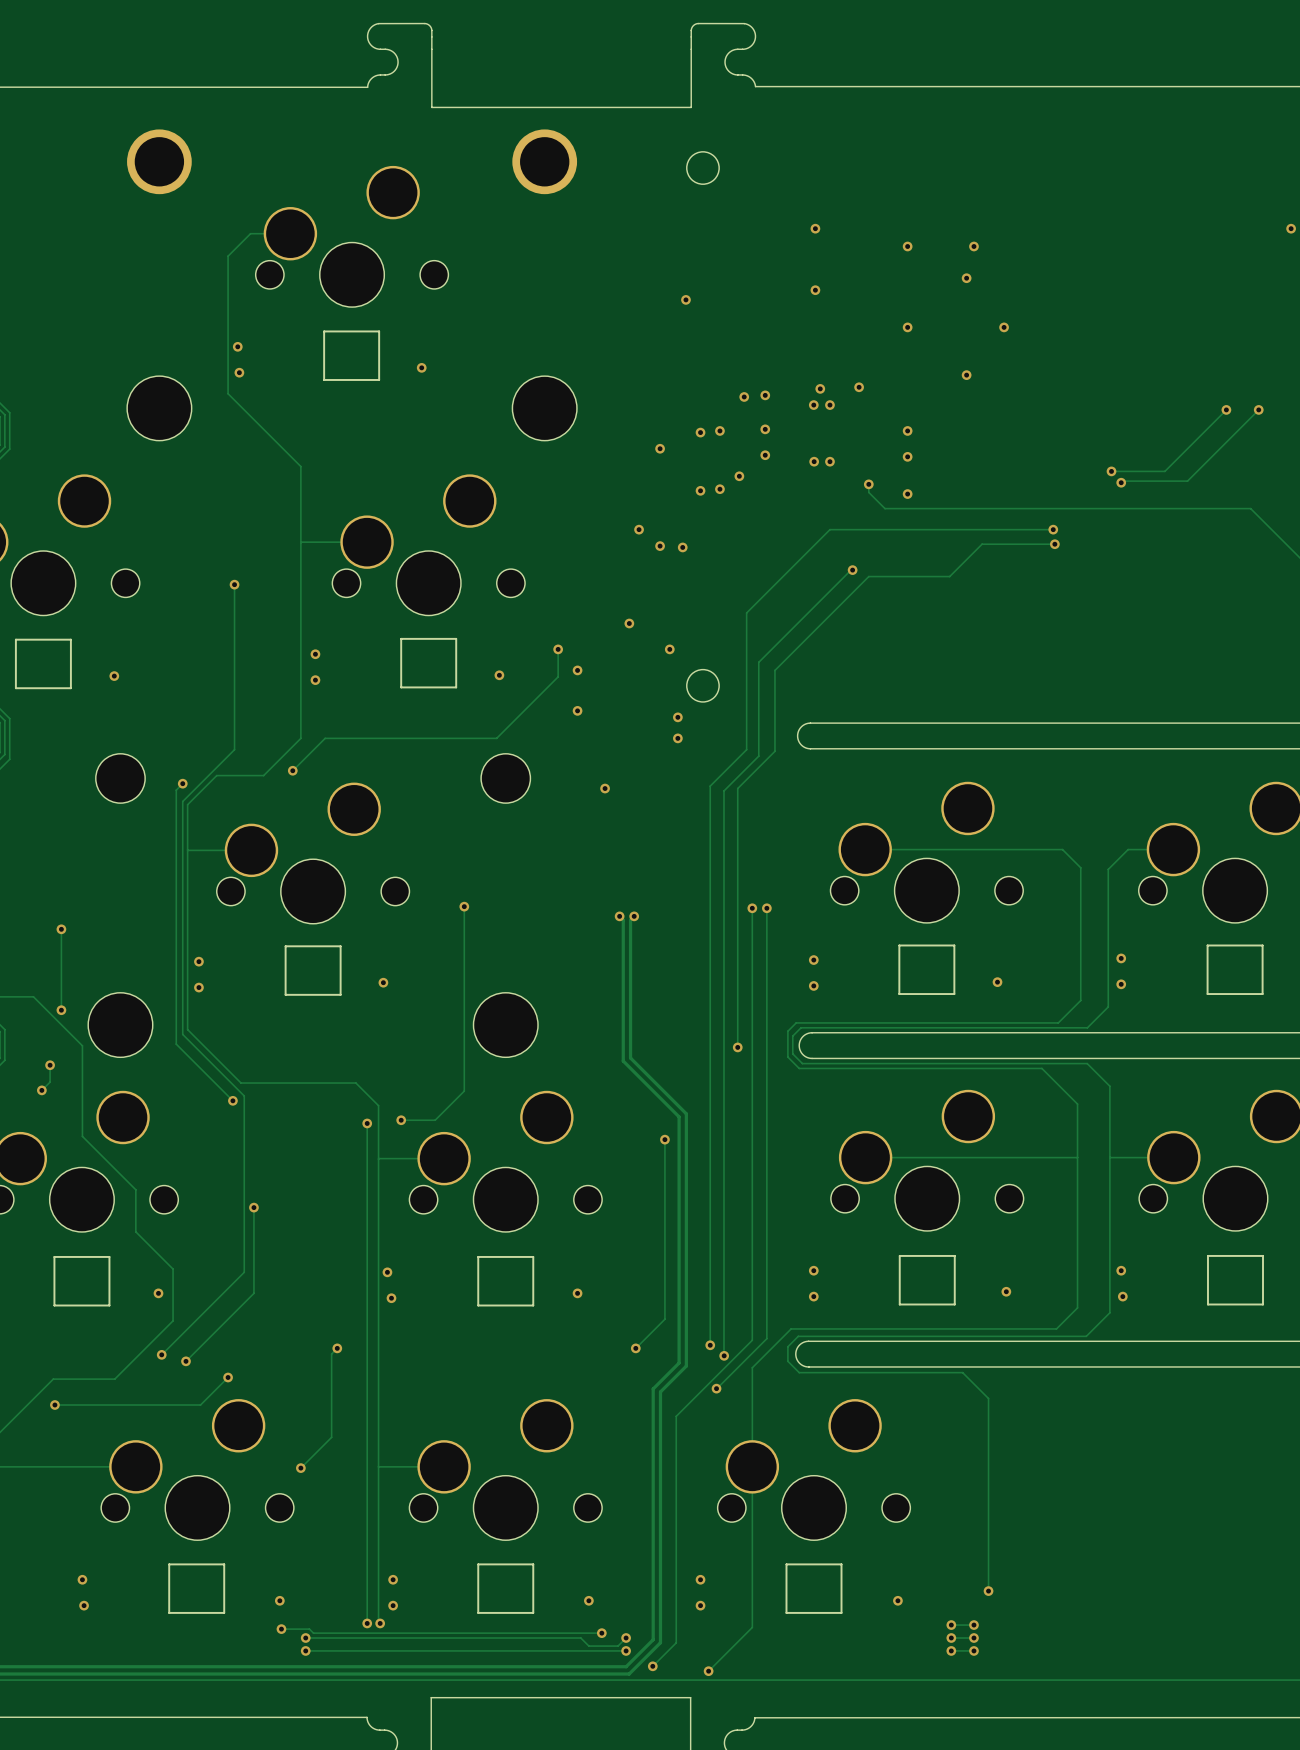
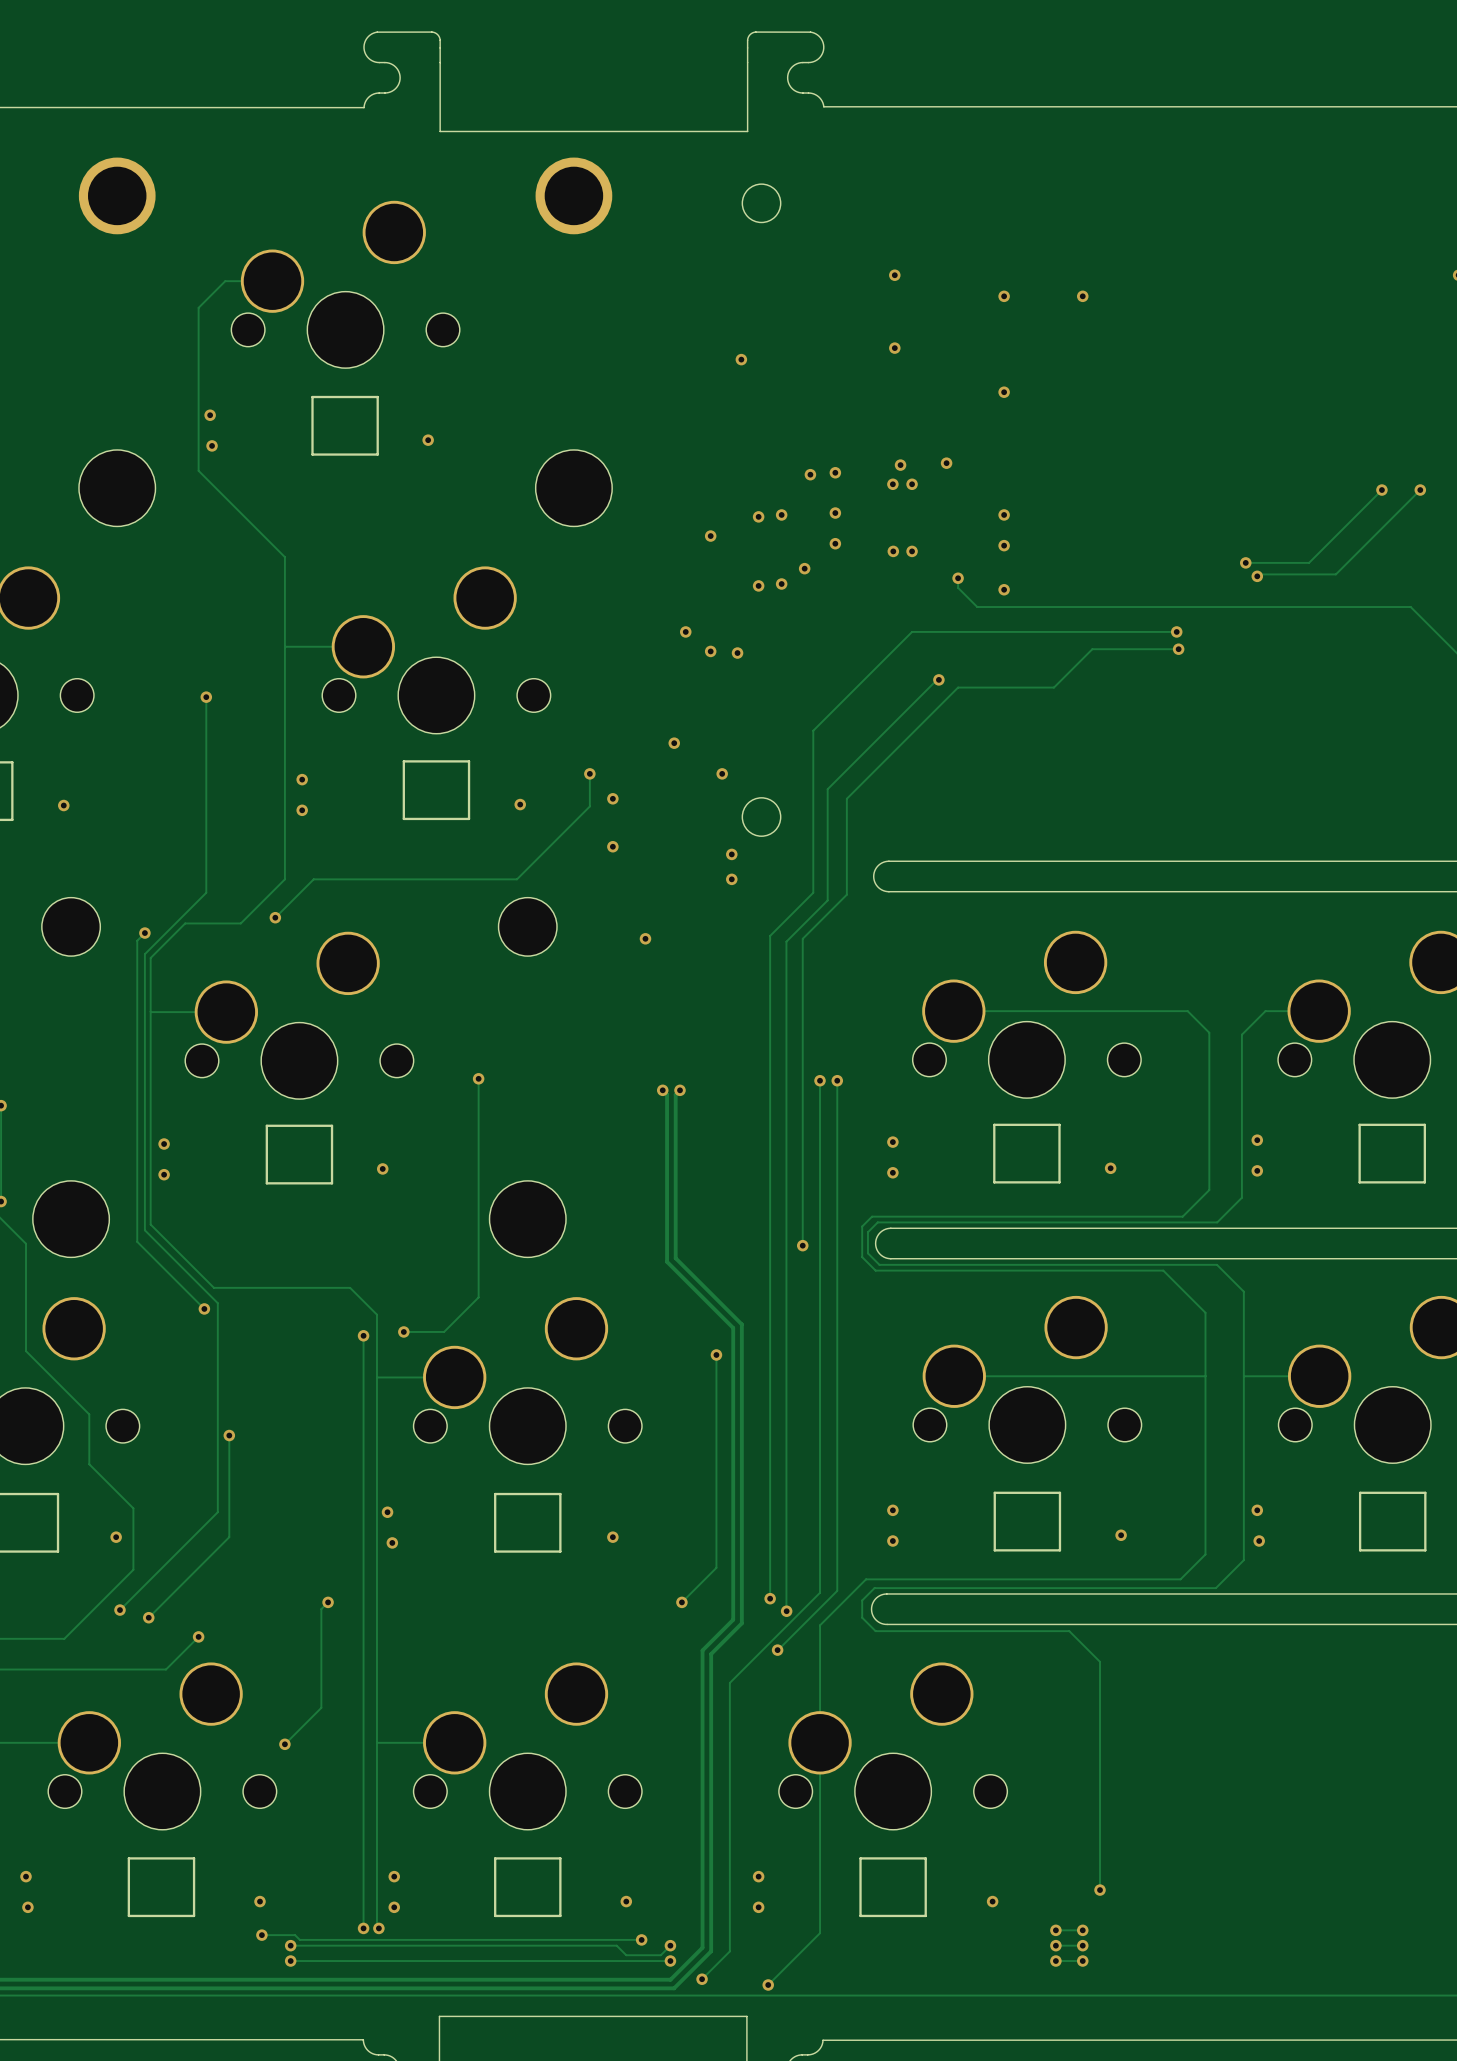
via: (966, 278) -> none
via: (1004, 327) -> none
via: (966, 375) -> none

